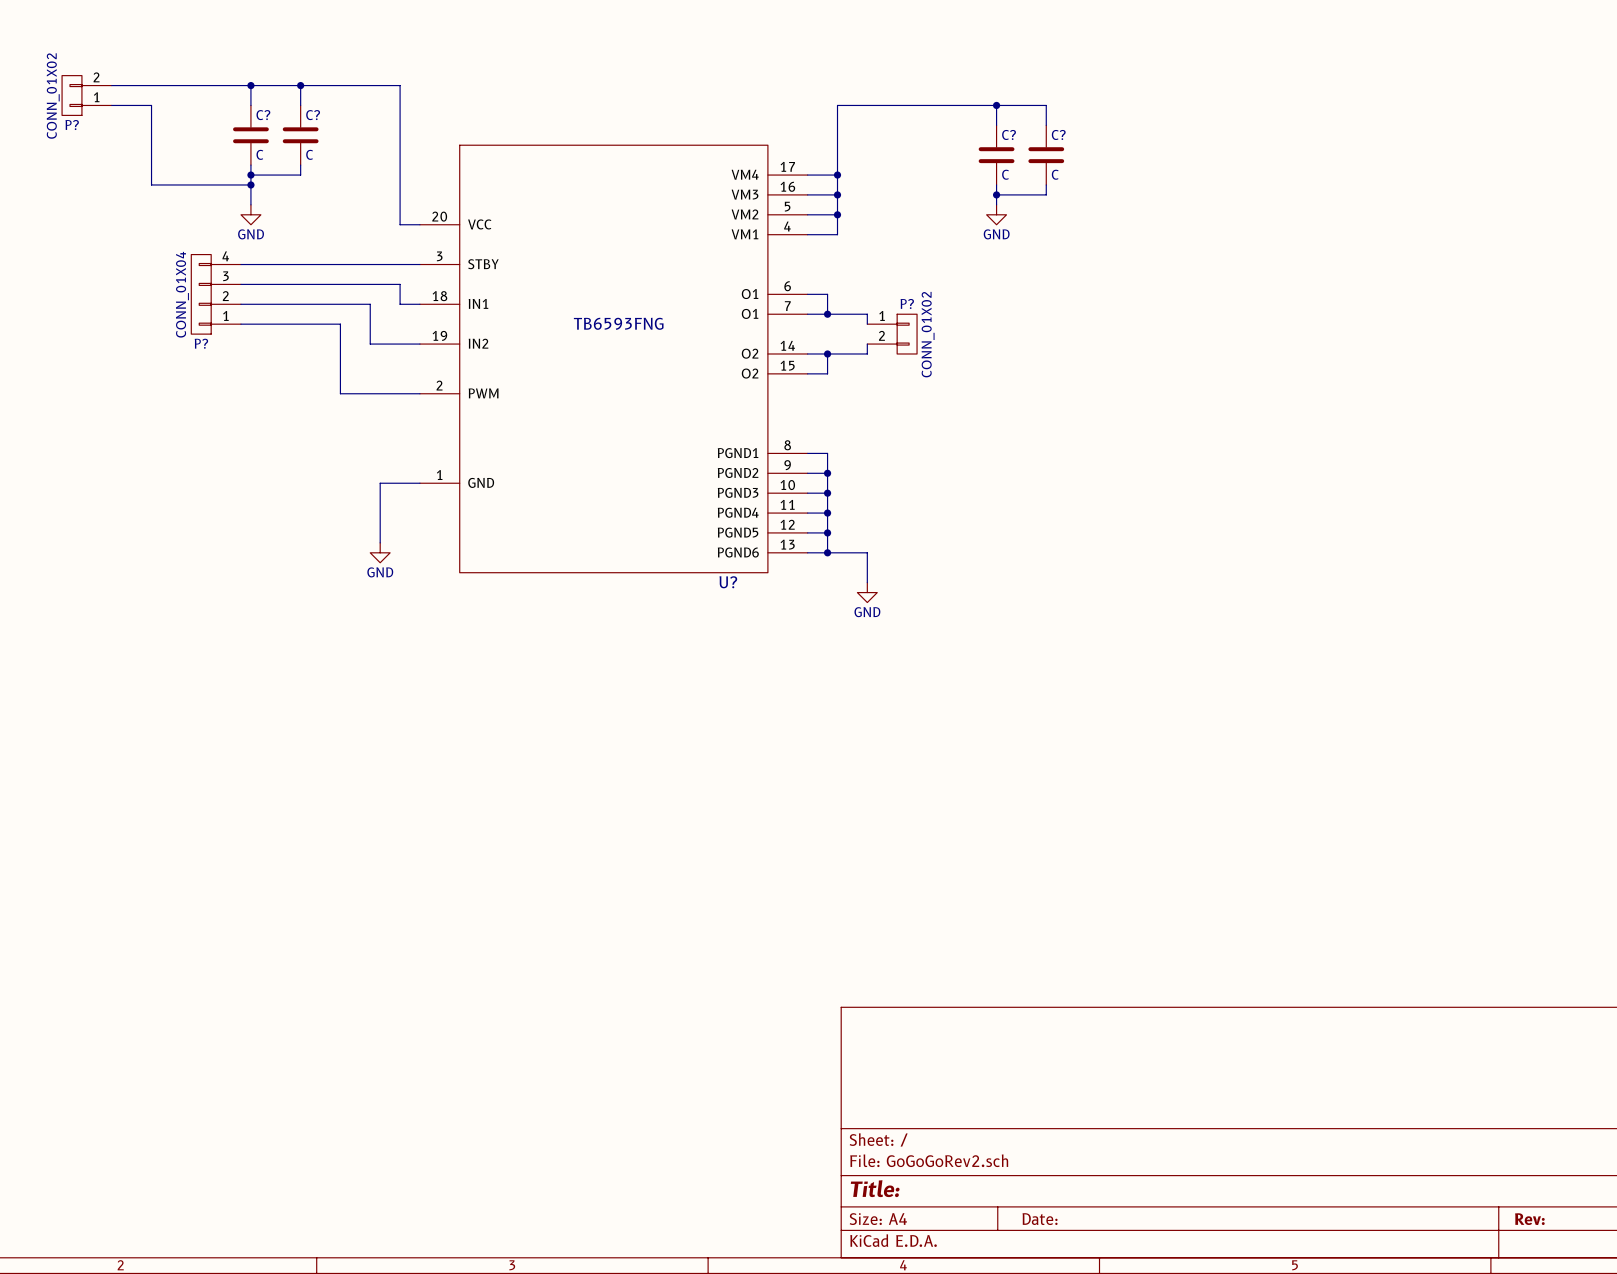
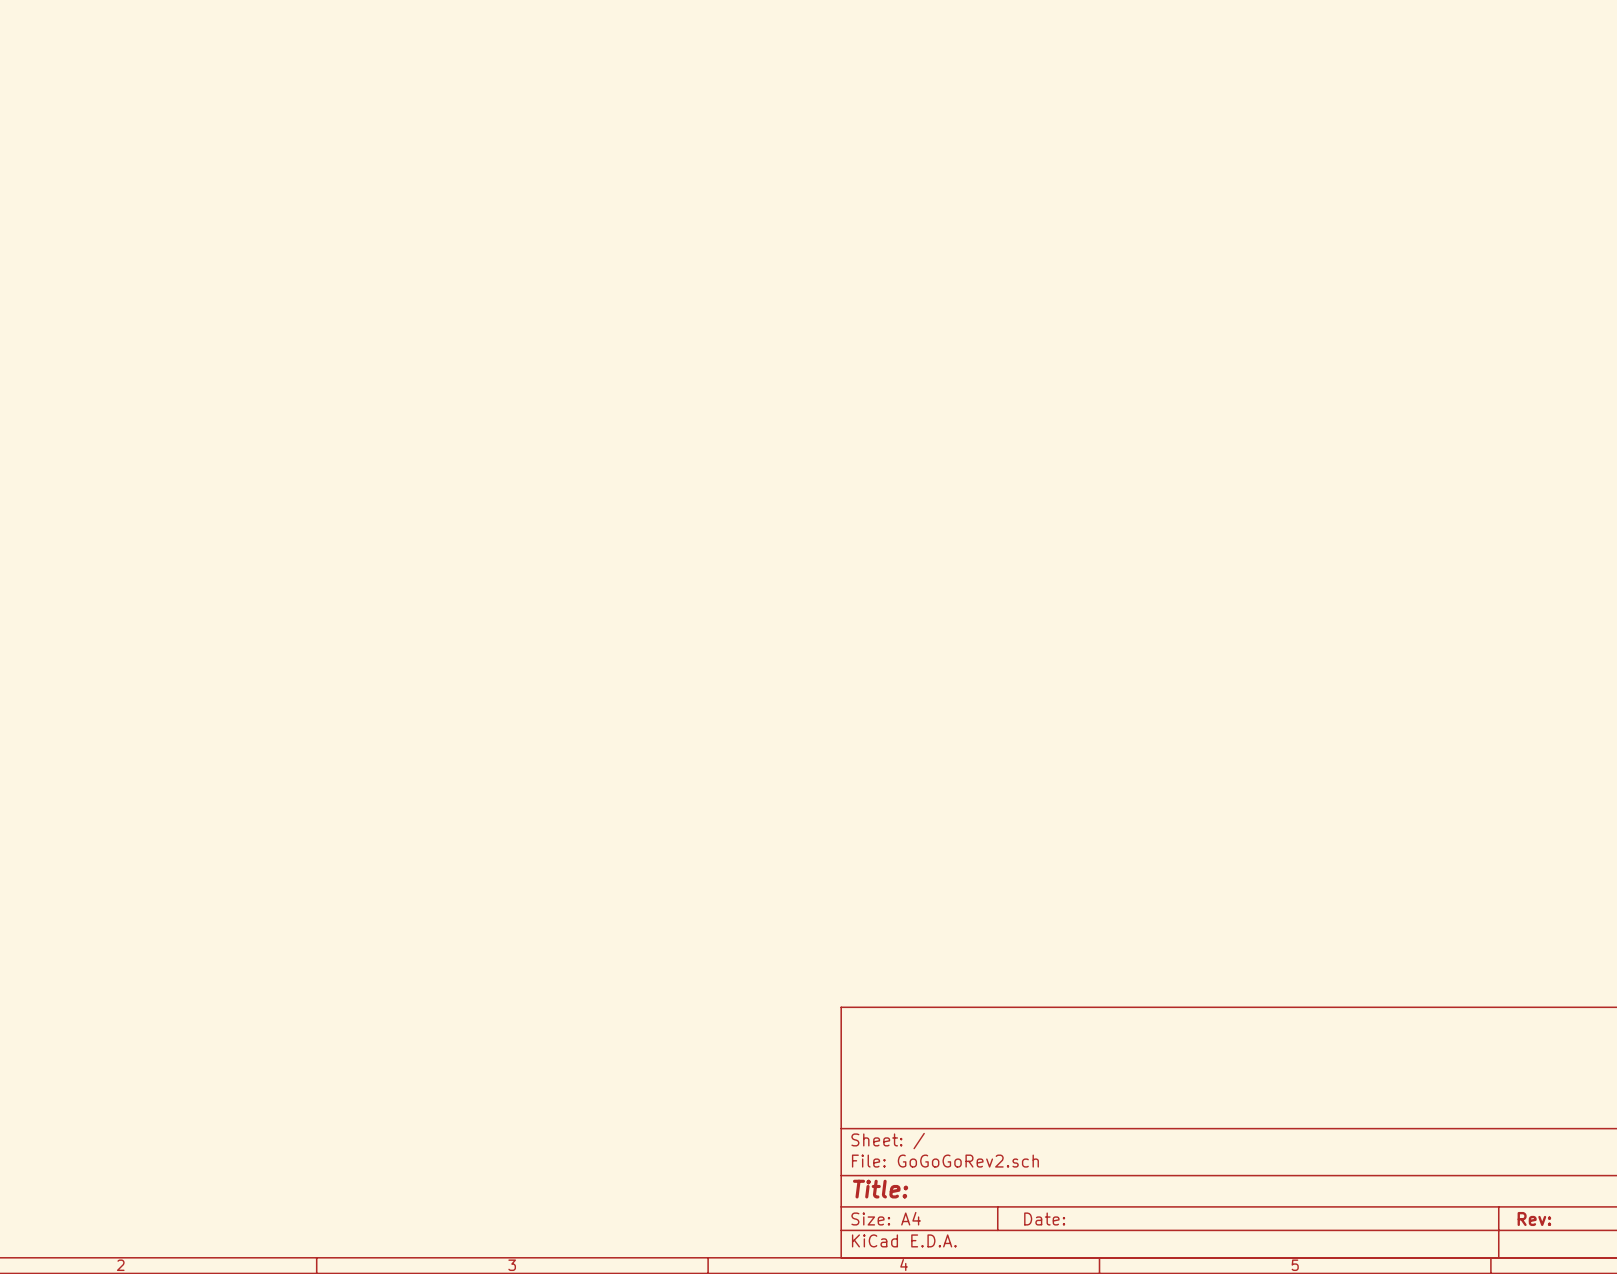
wire: (111, 85) (400, 85) (400, 224) (419, 224) -> none
wire: (250, 85) (250, 105) -> none
junction: (250, 85) -> none
wire: (300, 85) (300, 105) -> none
junction: (300, 85) -> none
P?: CONN_01X02 (86, 95) -> none
wire: (111, 105) (151, 105) (151, 184) (250, 184) -> none
wire: (996, 105) (996, 125) -> none
junction: (996, 105) -> none
wire: (1046, 125) (1046, 105) (837, 105) (837, 234) (807, 234) -> none
C?: C (250, 135) -> none
C?: C (300, 135) -> none
C?: C (996, 155) -> none
C?: C (1046, 155) -> none
wire: (250, 165) (250, 204) -> none
wire: (300, 165) (300, 175) (250, 175) -> none
junction: (250, 175) -> none
wire: (807, 175) (837, 175) -> none
junction: (837, 175) -> none
junction: (250, 184) -> none
wire: (996, 184) (996, 204) -> none
wire: (1046, 184) (1046, 194) (996, 194) -> none
wire: (807, 194) (837, 194) -> none
junction: (837, 194) -> none
junction: (996, 194) -> none
power symbol: GND (250, 214) -> none
wire: (807, 214) (837, 214) -> none
junction: (837, 214) -> none
power symbol: GND (996, 214) -> none
wire: (241, 264) (419, 264) -> none
wire: (241, 284) (400, 284) (400, 304) (419, 304) -> none
P?: CONN_01X04 (216, 294) -> none
wire: (807, 294) (827, 294) (827, 314) -> none
wire: (241, 304) (370, 304) (370, 344) (419, 344) -> none
wire: (807, 314) (867, 314) (867, 324) -> none
junction: (827, 314) -> none
wire: (241, 324) (340, 324) (340, 393) (419, 393) -> none
P?: CONN_01X02 (892, 334) -> none
wire: (867, 344) (867, 353) (807, 353) -> none
wire: (827, 353) (827, 373) (807, 373) -> none
junction: (827, 353) -> none
U?: TB6593FNG (613, 358) -> none
wire: (807, 453) (827, 453) (827, 552) -> none
wire: (807, 473) (827, 473) -> none
junction: (827, 473) -> none
wire: (419, 483) (380, 483) (380, 542) -> none
wire: (807, 493) (827, 493) -> none
junction: (827, 493) -> none
wire: (807, 513) (827, 513) -> none
junction: (827, 513) -> none
wire: (807, 532) (827, 532) -> none
junction: (827, 532) -> none
power symbol: GND (380, 552) -> none
wire: (807, 552) (867, 552) (867, 582) -> none
junction: (827, 552) -> none
power symbol: GND (867, 592) -> none

